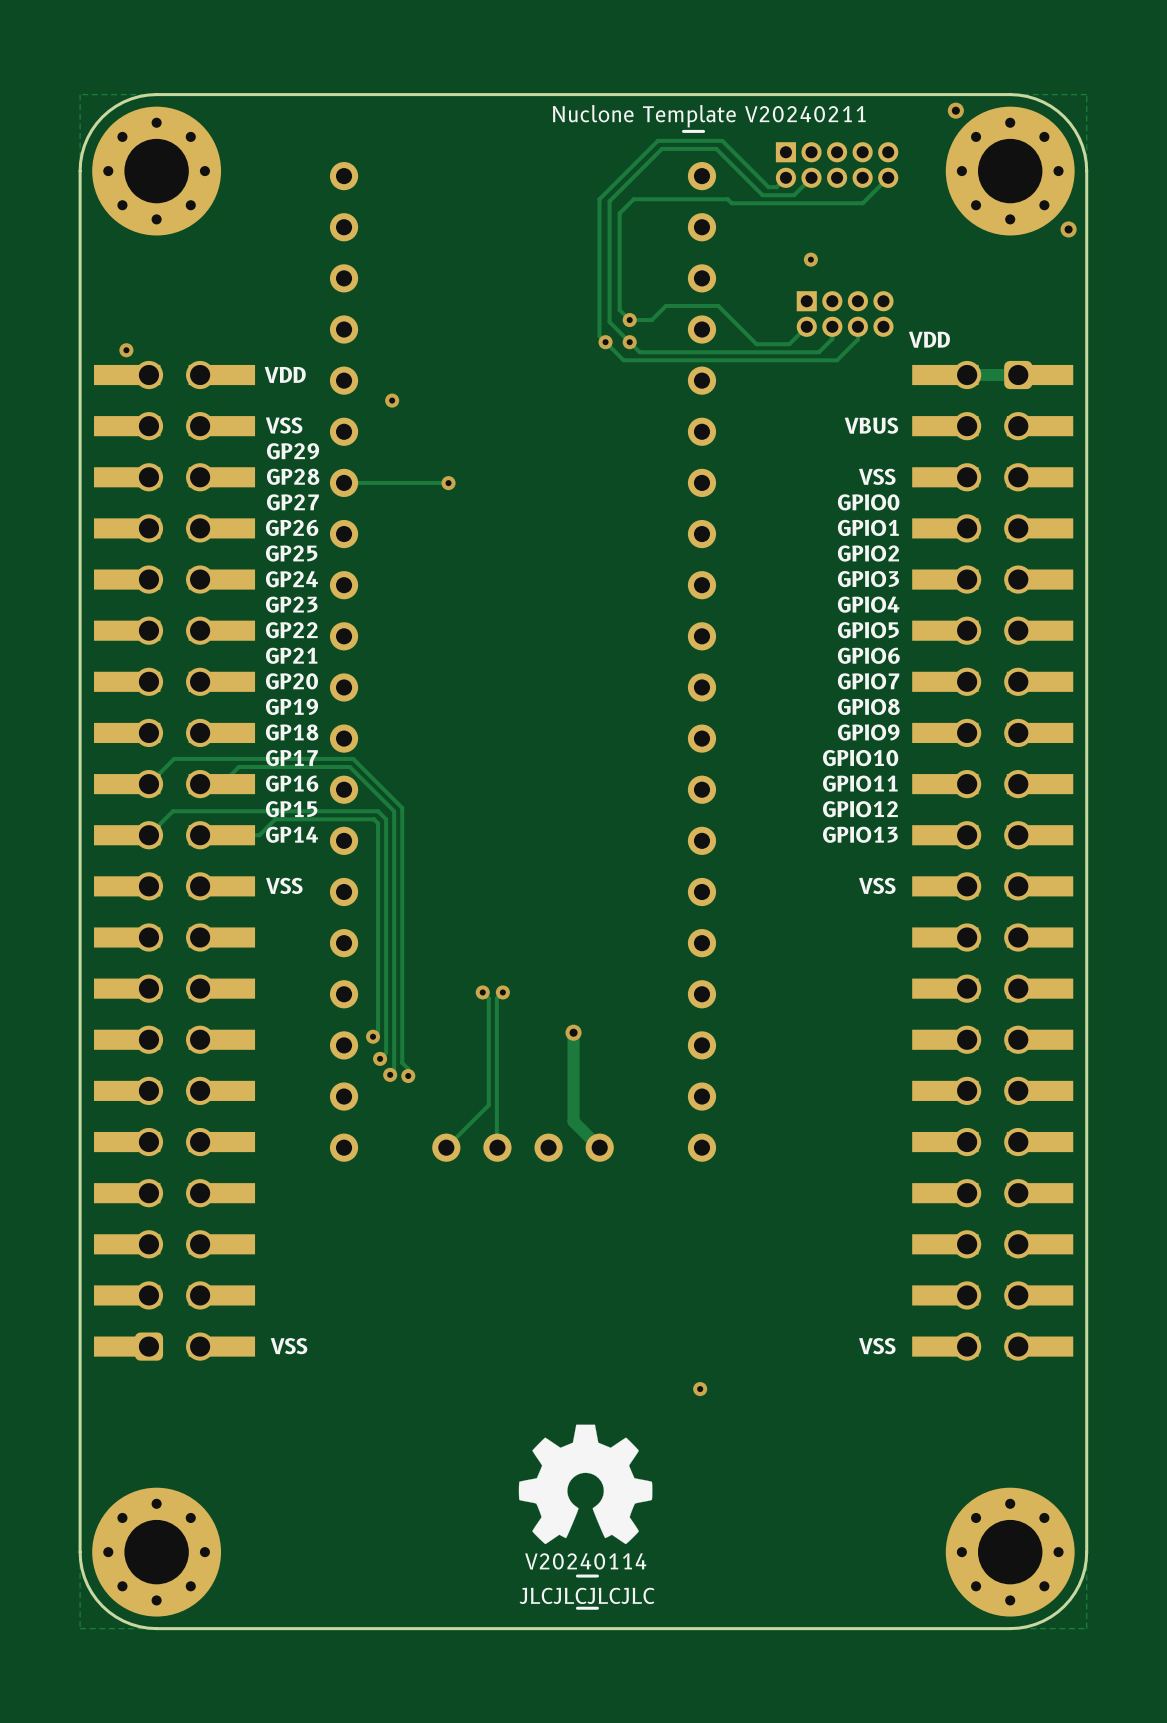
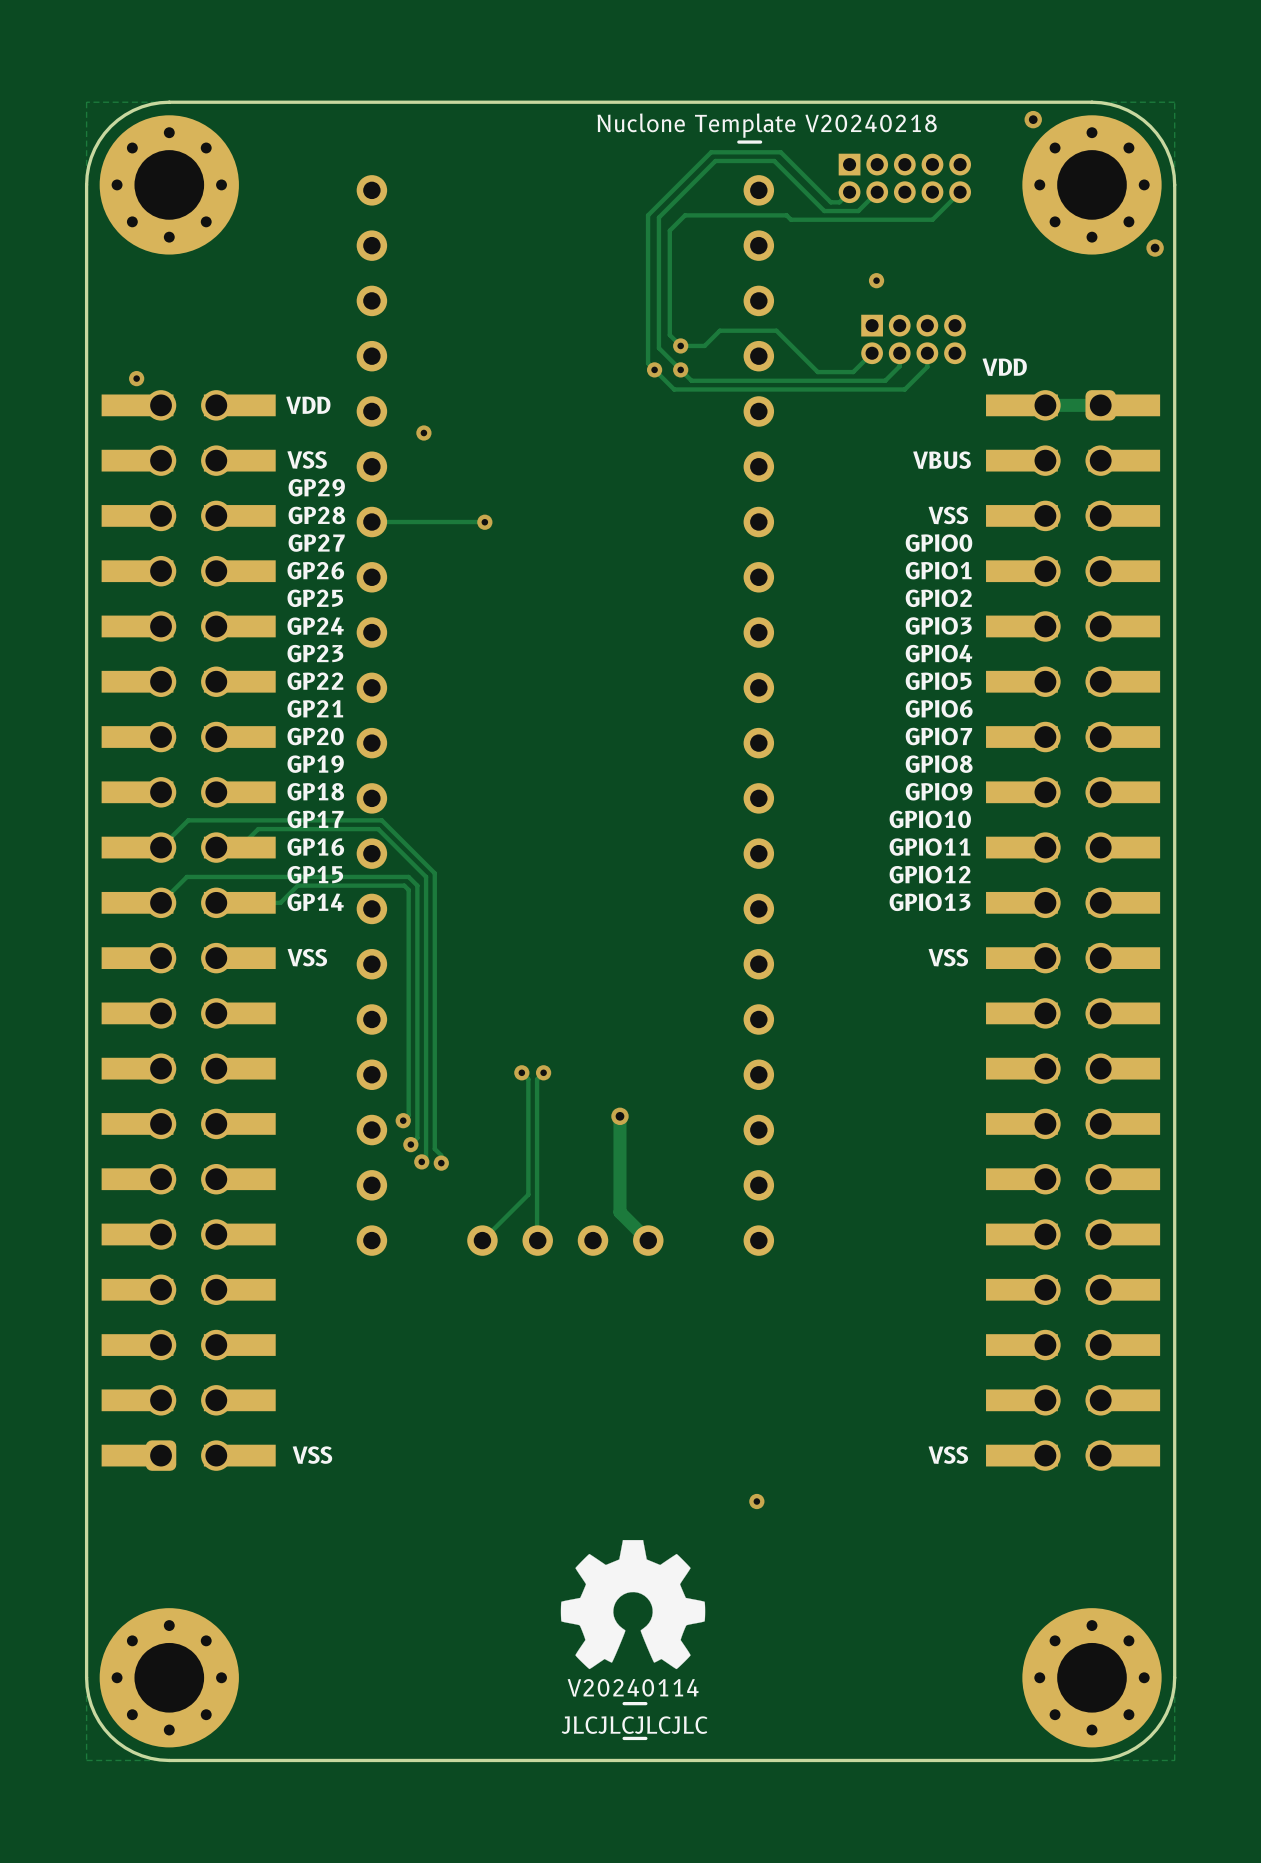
drawing shape: [552, 104, 866, 133] -> [597, 113, 937, 144]

